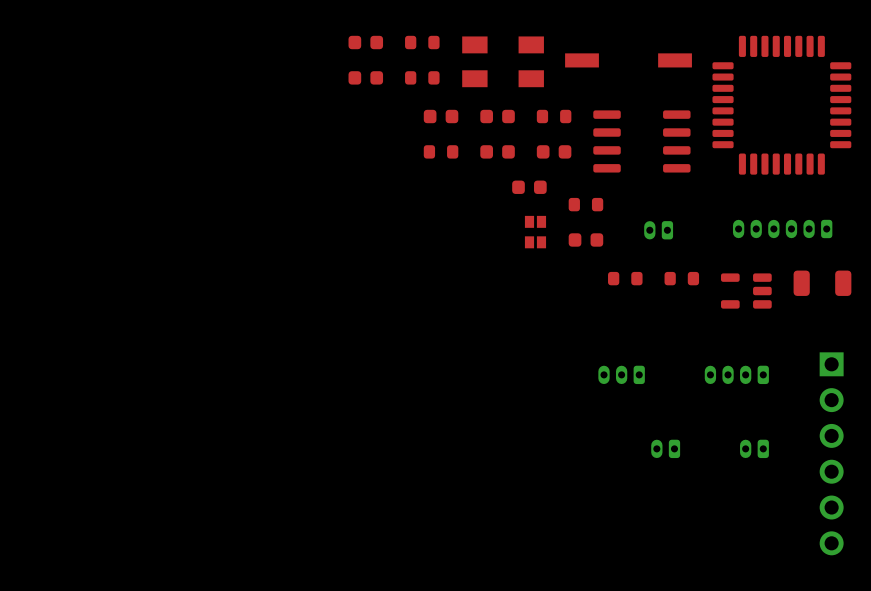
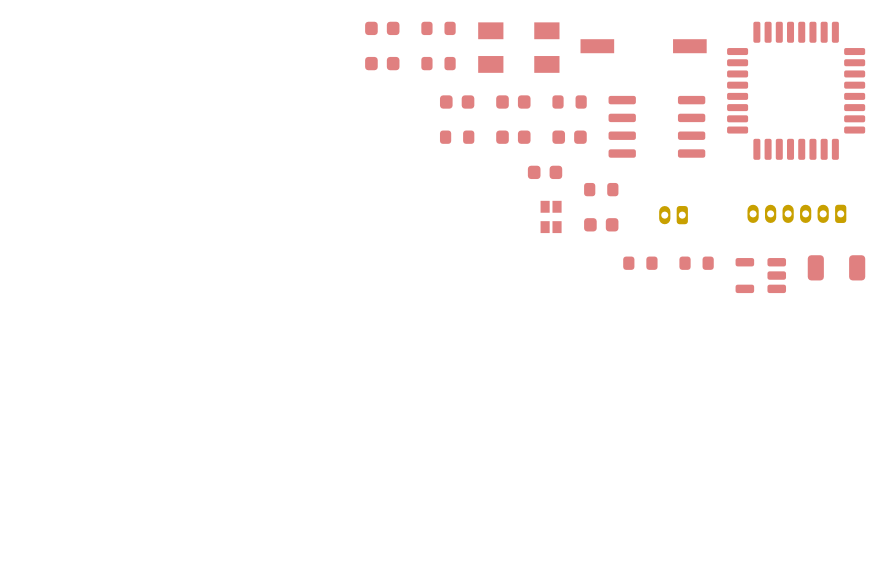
part: (621, 374) -> none
part: (736, 374) -> none
part: (665, 448) -> none
part: (754, 448) -> none
part: (831, 453) -> none

